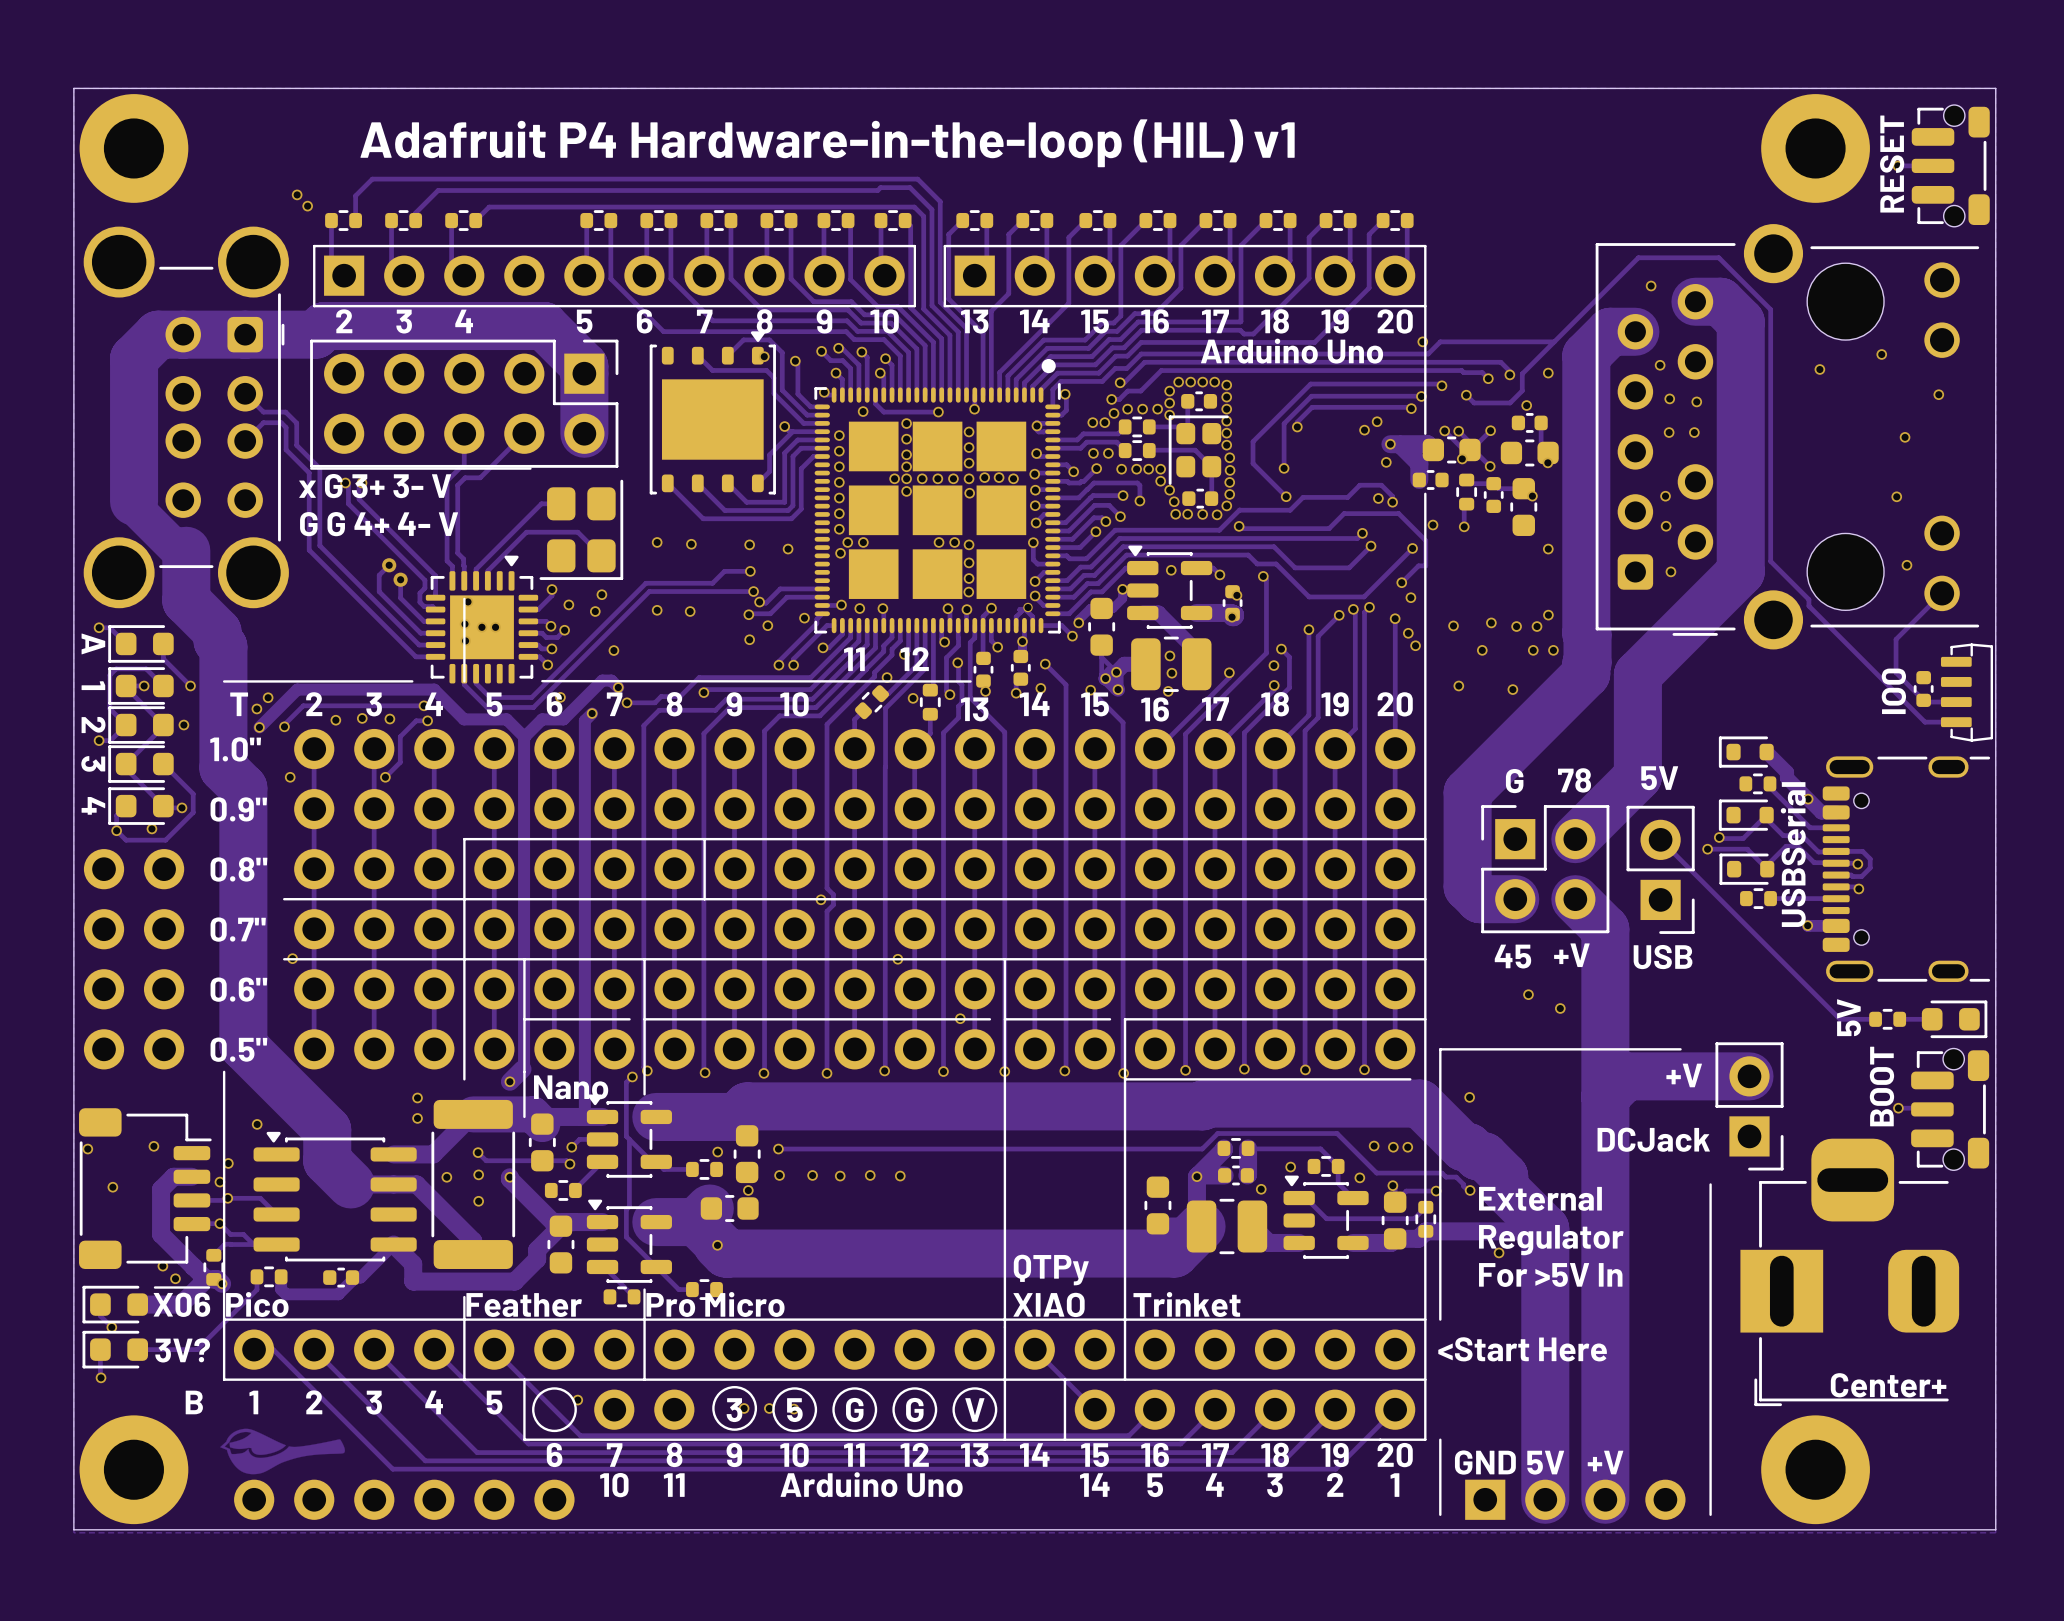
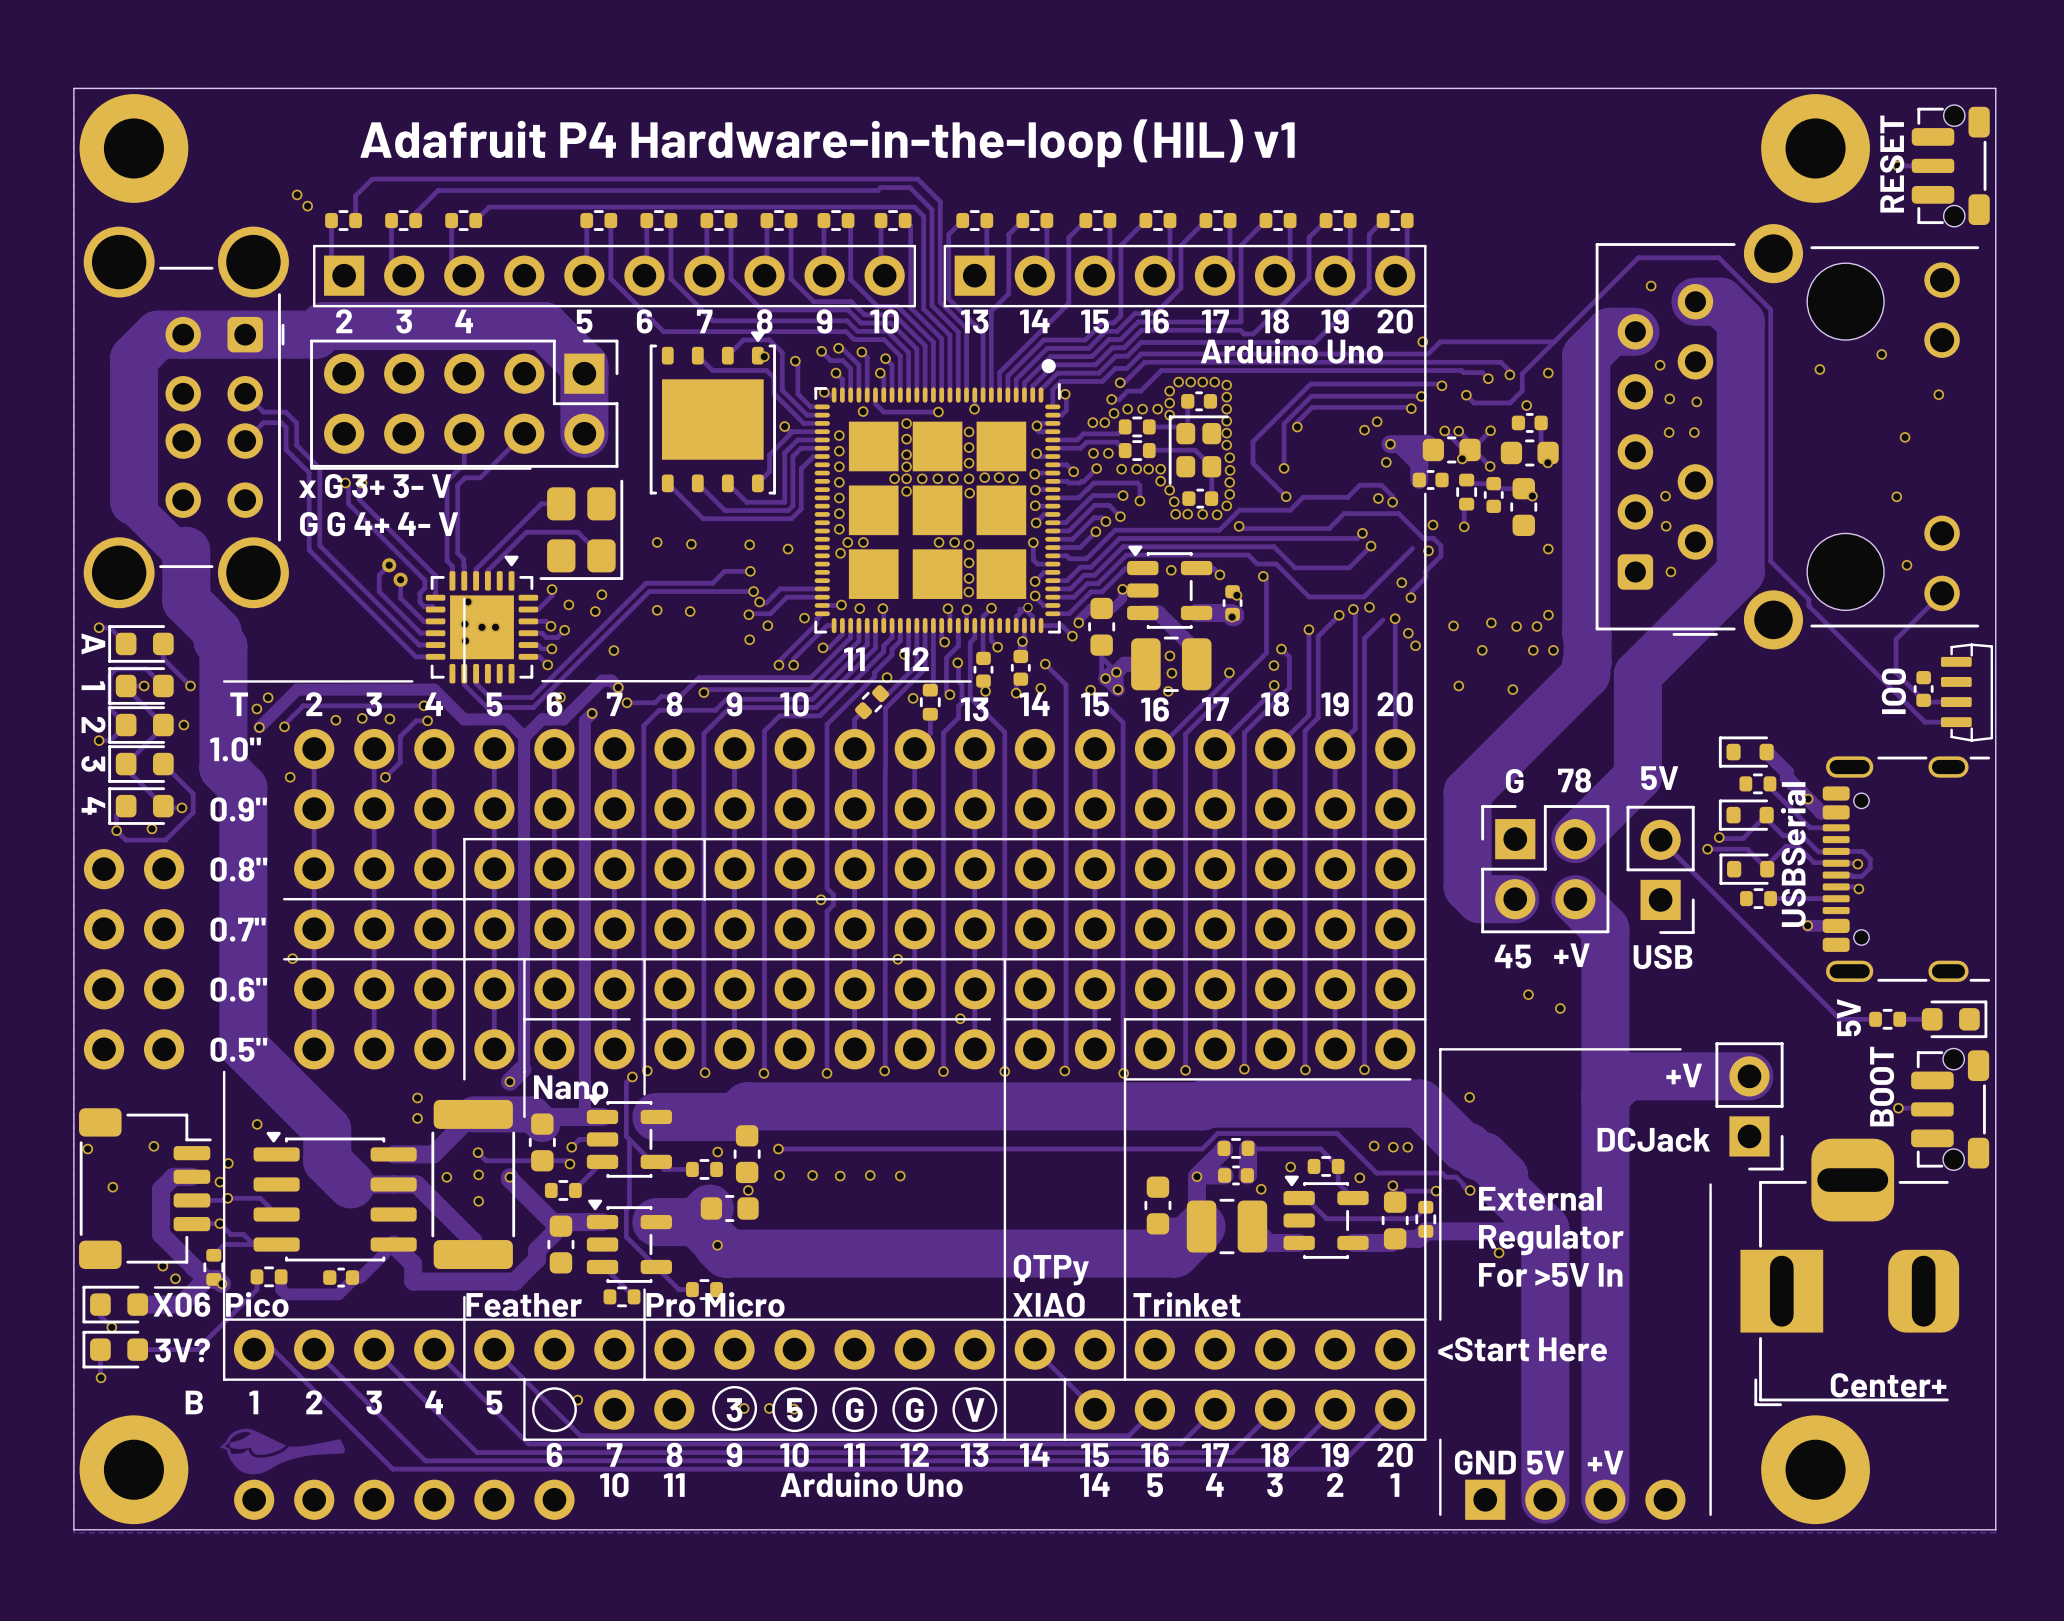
track: (1423, 538) (1425, 540) (1425, 565) (1418, 565) (1401, 582) -> (1423, 538) (1433, 538) (1440, 545) (1440, 556) (1425, 571) (1425, 577) (1411, 591)
via position: (1412, 548) -> (1428, 550)
track: (1369, 607) (1364, 612) (1364, 638) -> (1382, 620) (1364, 638)

